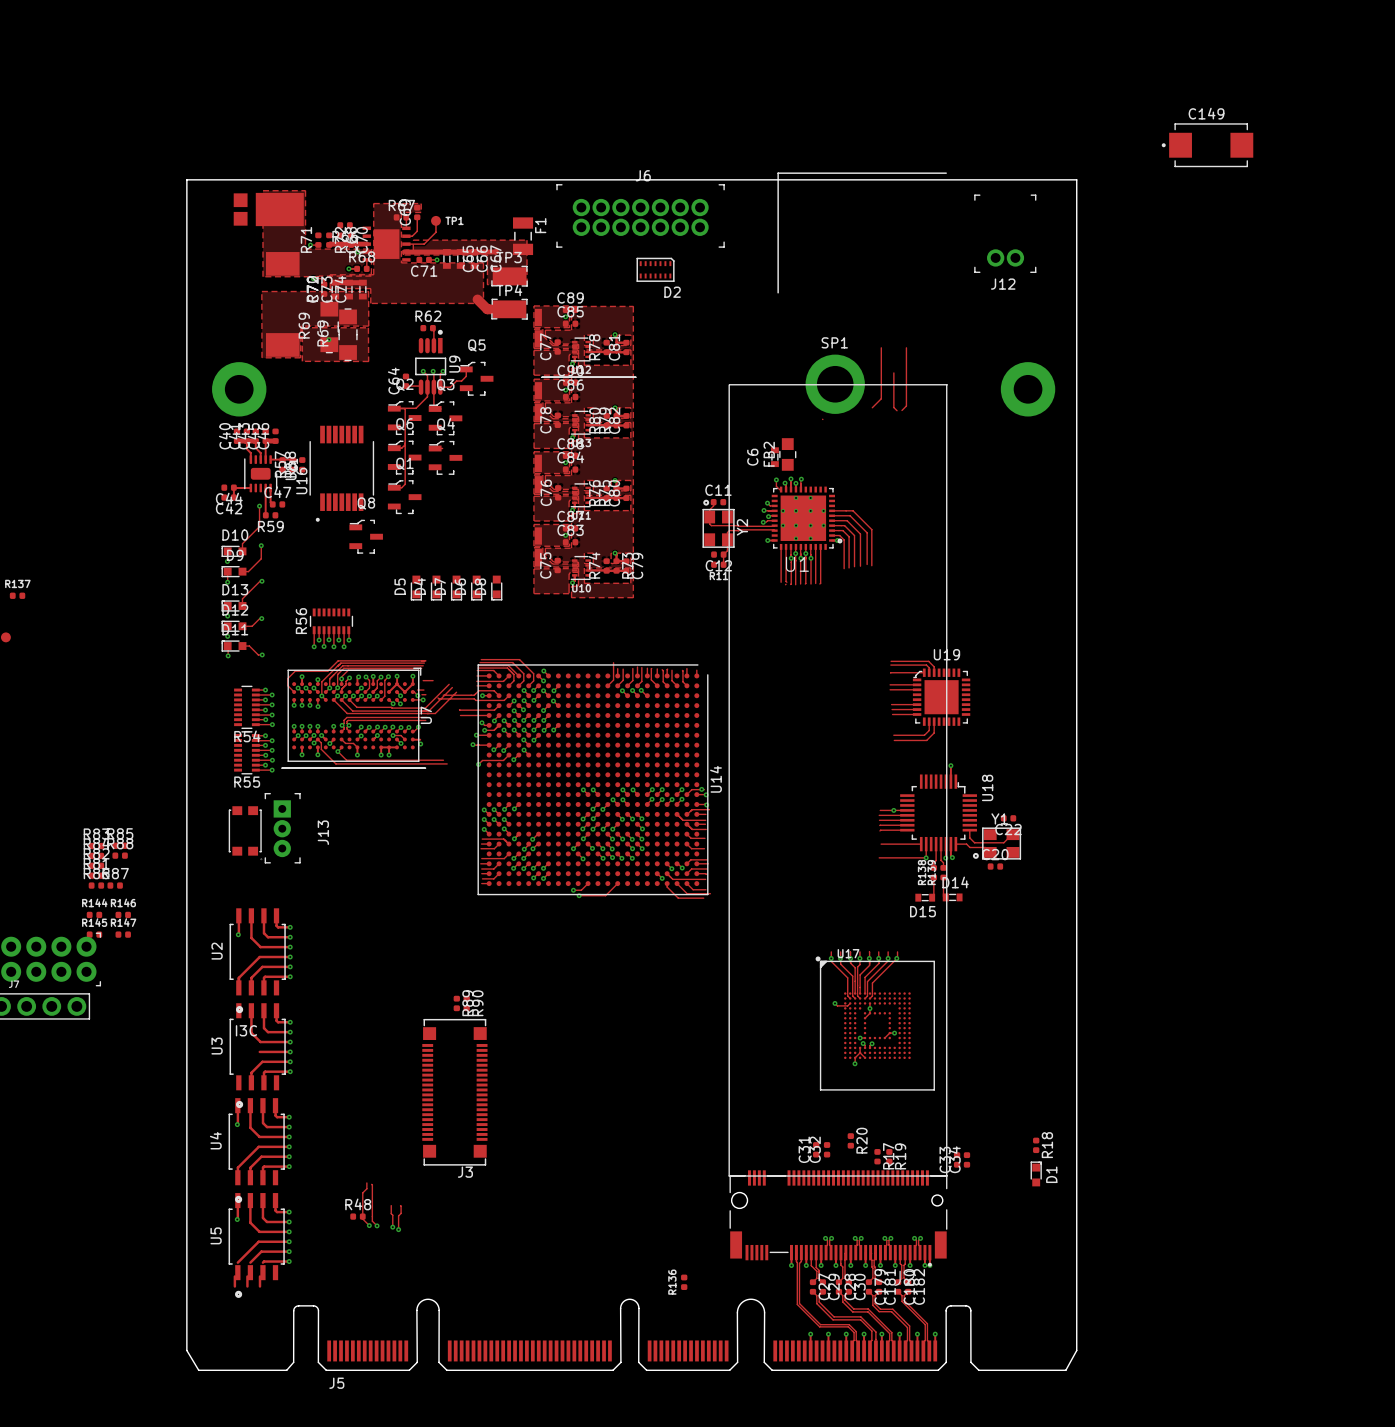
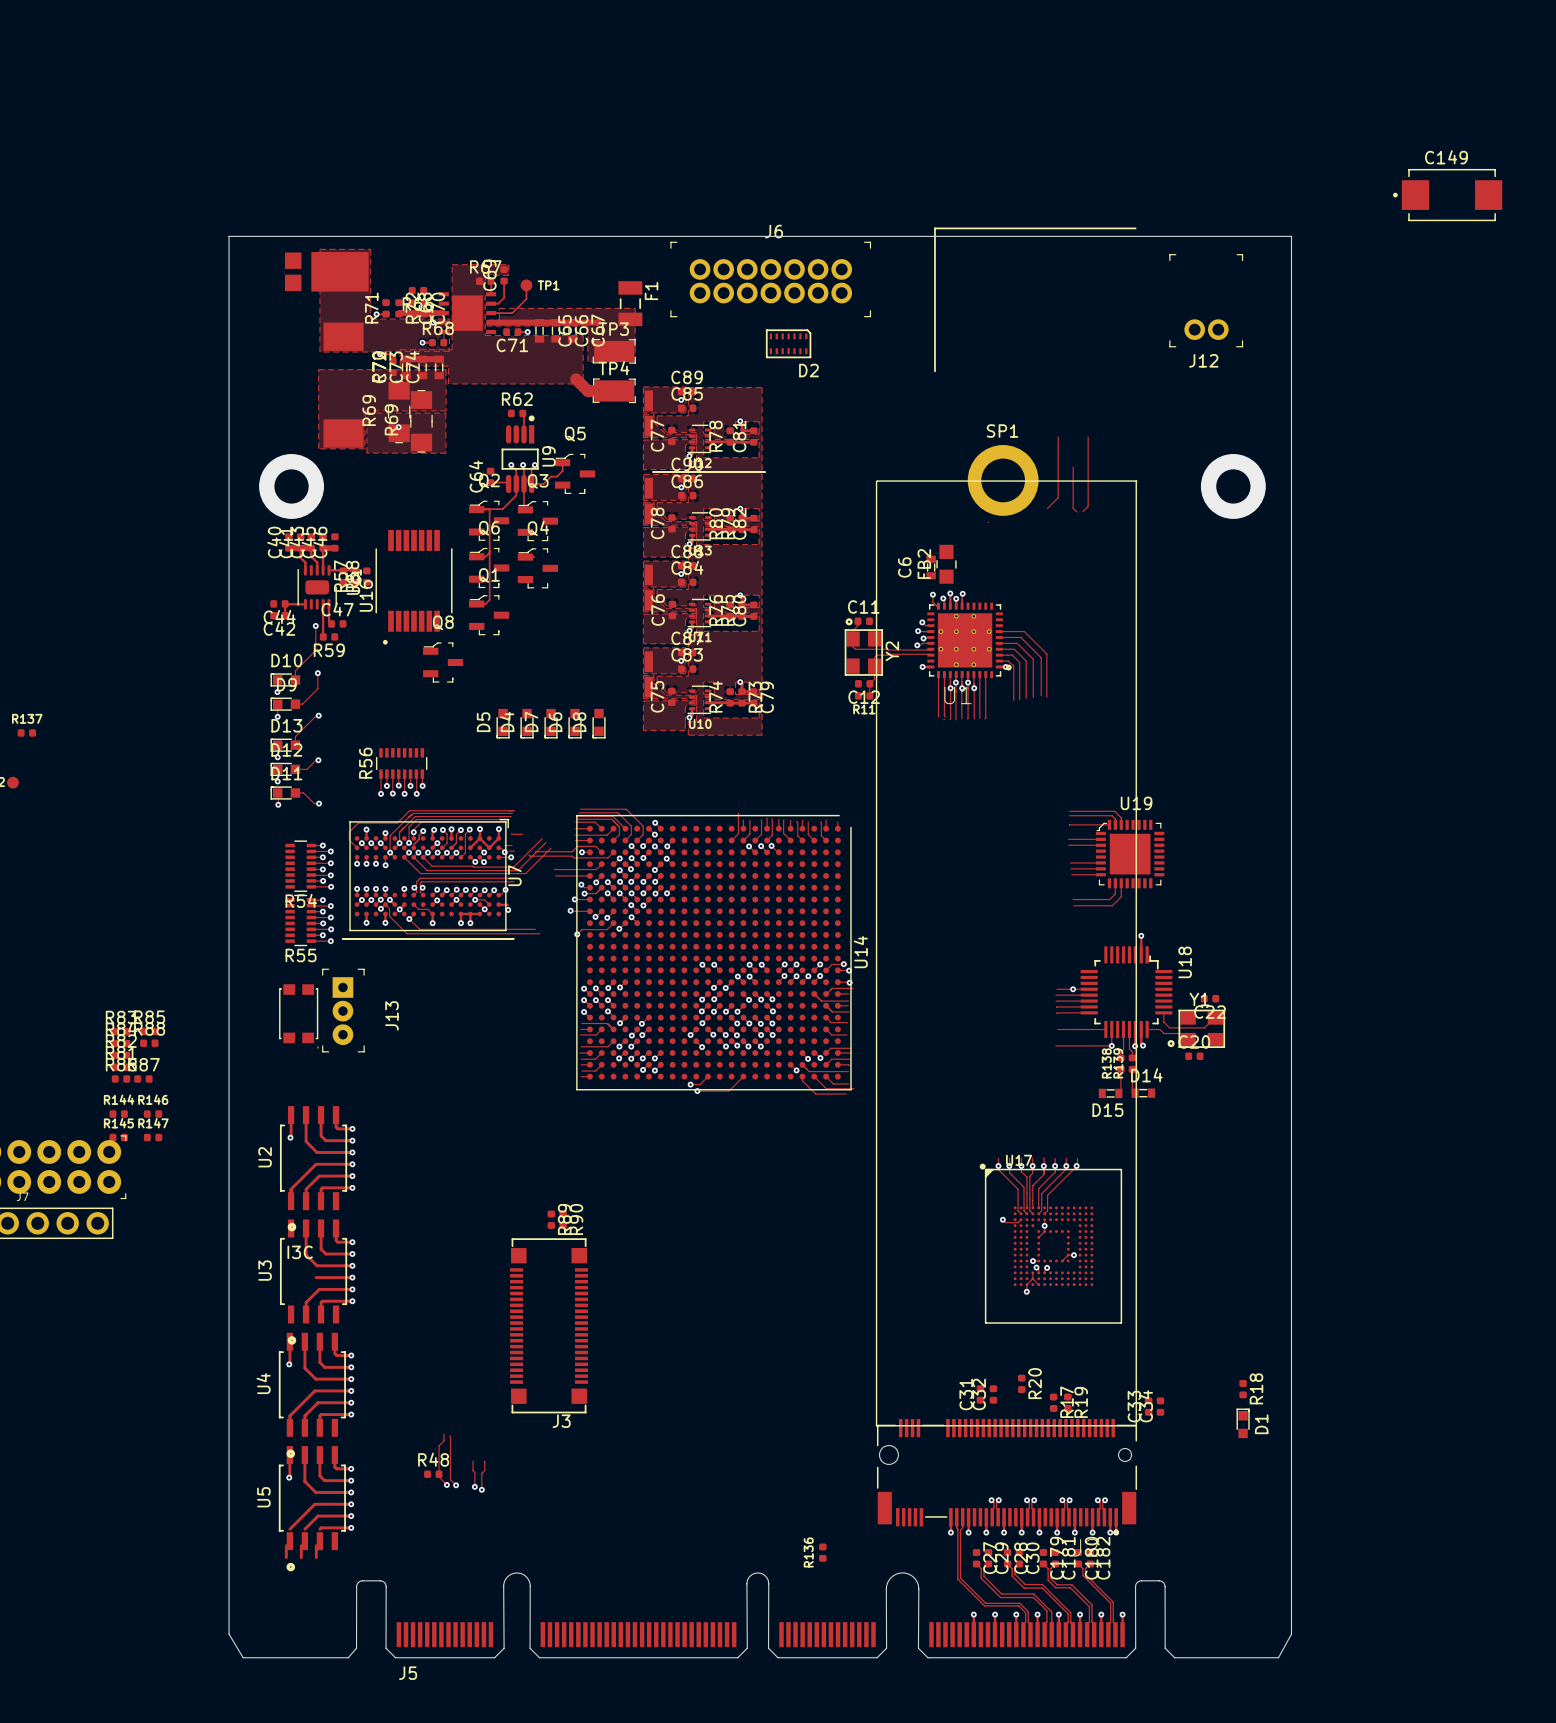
track: (811, 1252) (811, 1265) (816, 1271) (816, 1278) (812, 1282) -> none
track: (816, 1252) (816, 1267) (819, 1272) -> none
track: (840, 1252) (842, 1278) (838, 1282) -> none
track: (900, 1252) (901, 1278) (898, 1282) -> none
track: (905, 1252) (904, 1278) (908, 1282) -> none
track: (871, 1253) (870, 1252) (872, 1278) (868, 1282) -> none
track: (874, 1253) (875, 1278) (879, 1282) -> none
track: (844, 1259) (845, 1258) (845, 1252) (844, 1253) (844, 1278) (848, 1282) -> none
track: (819, 1272) (819, 1278) (822, 1282) -> none

